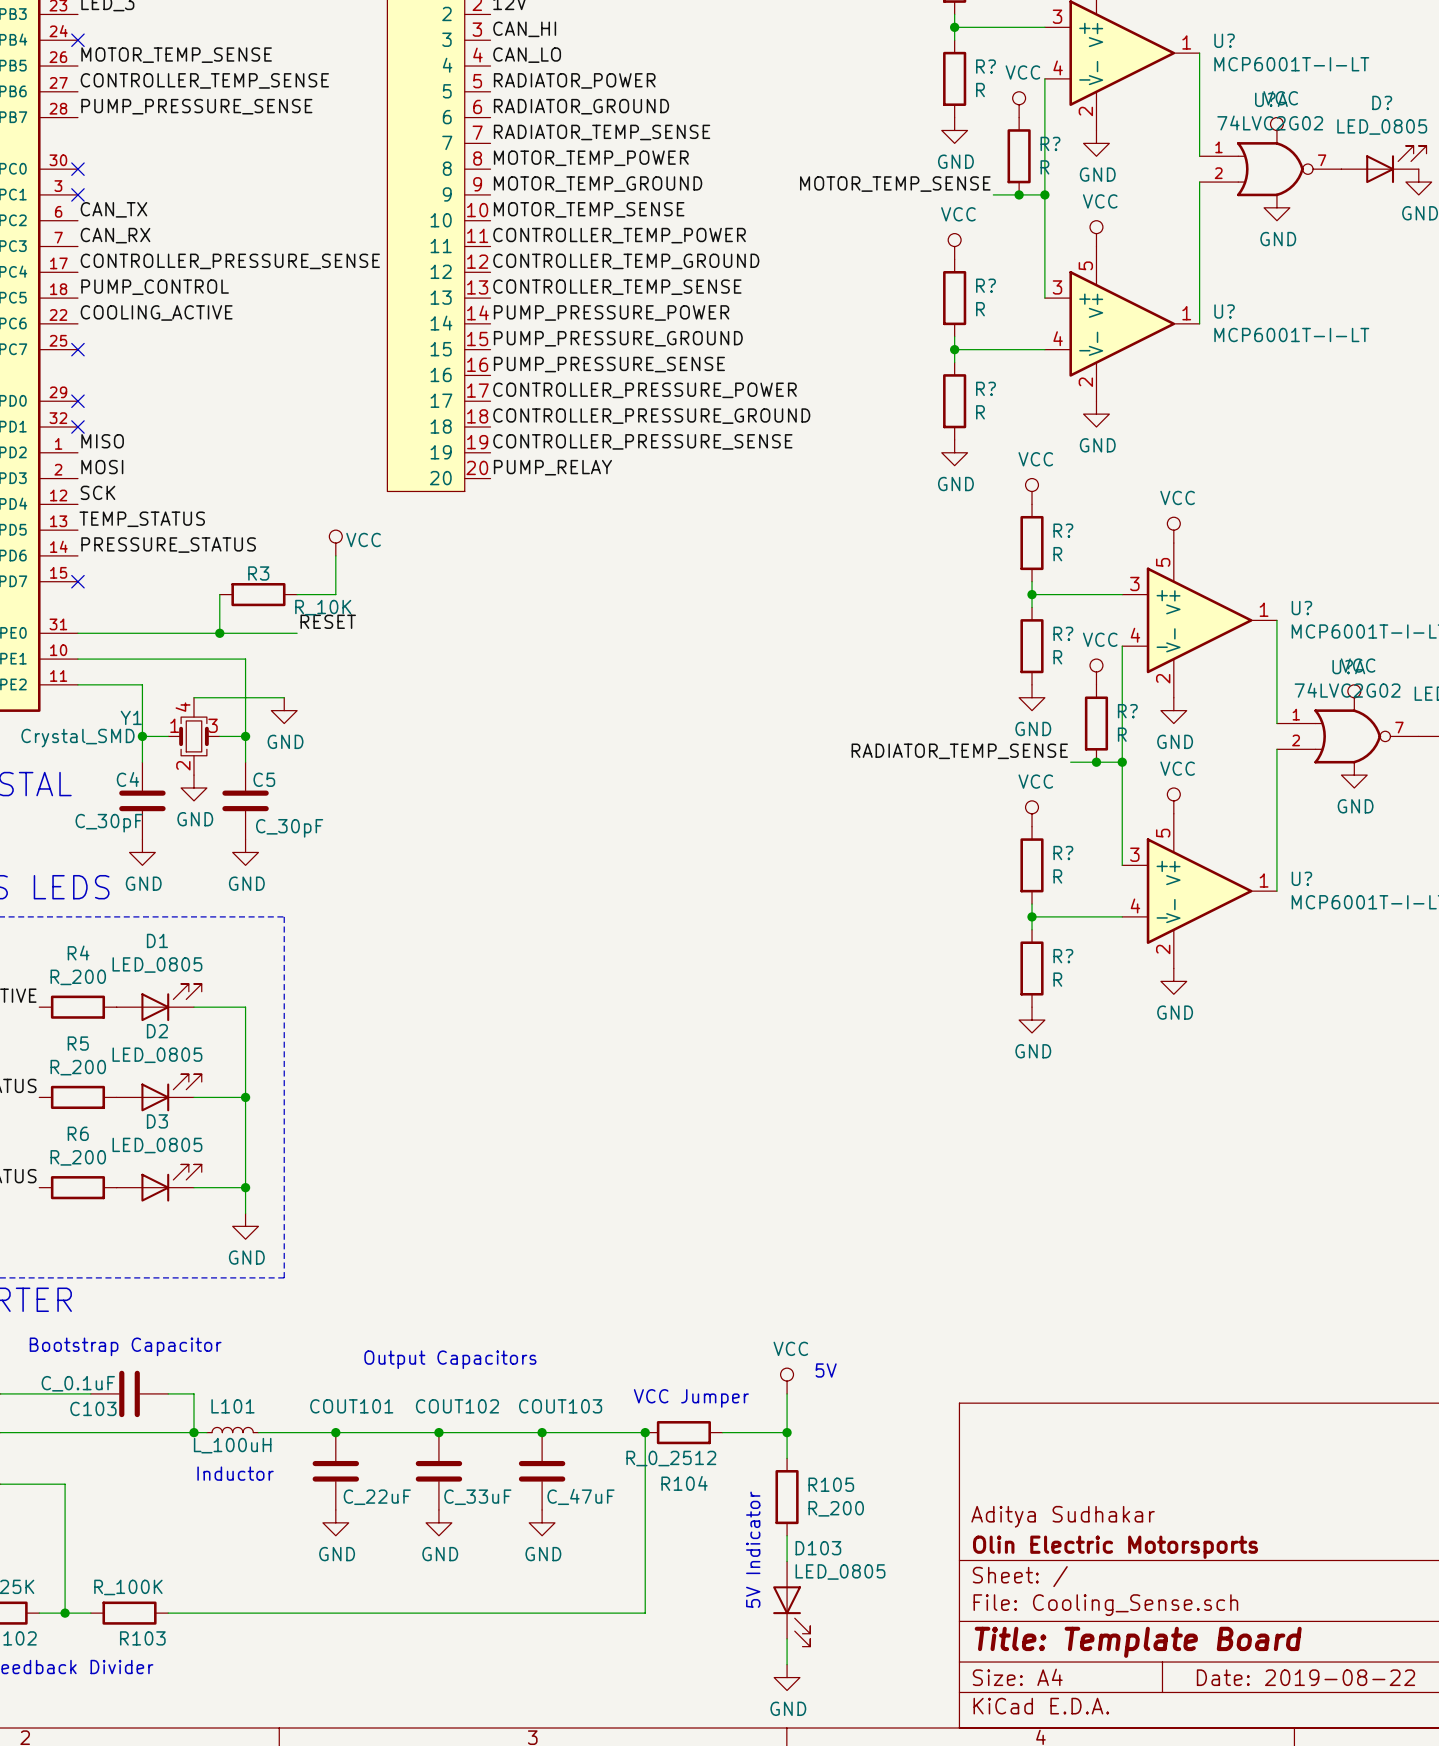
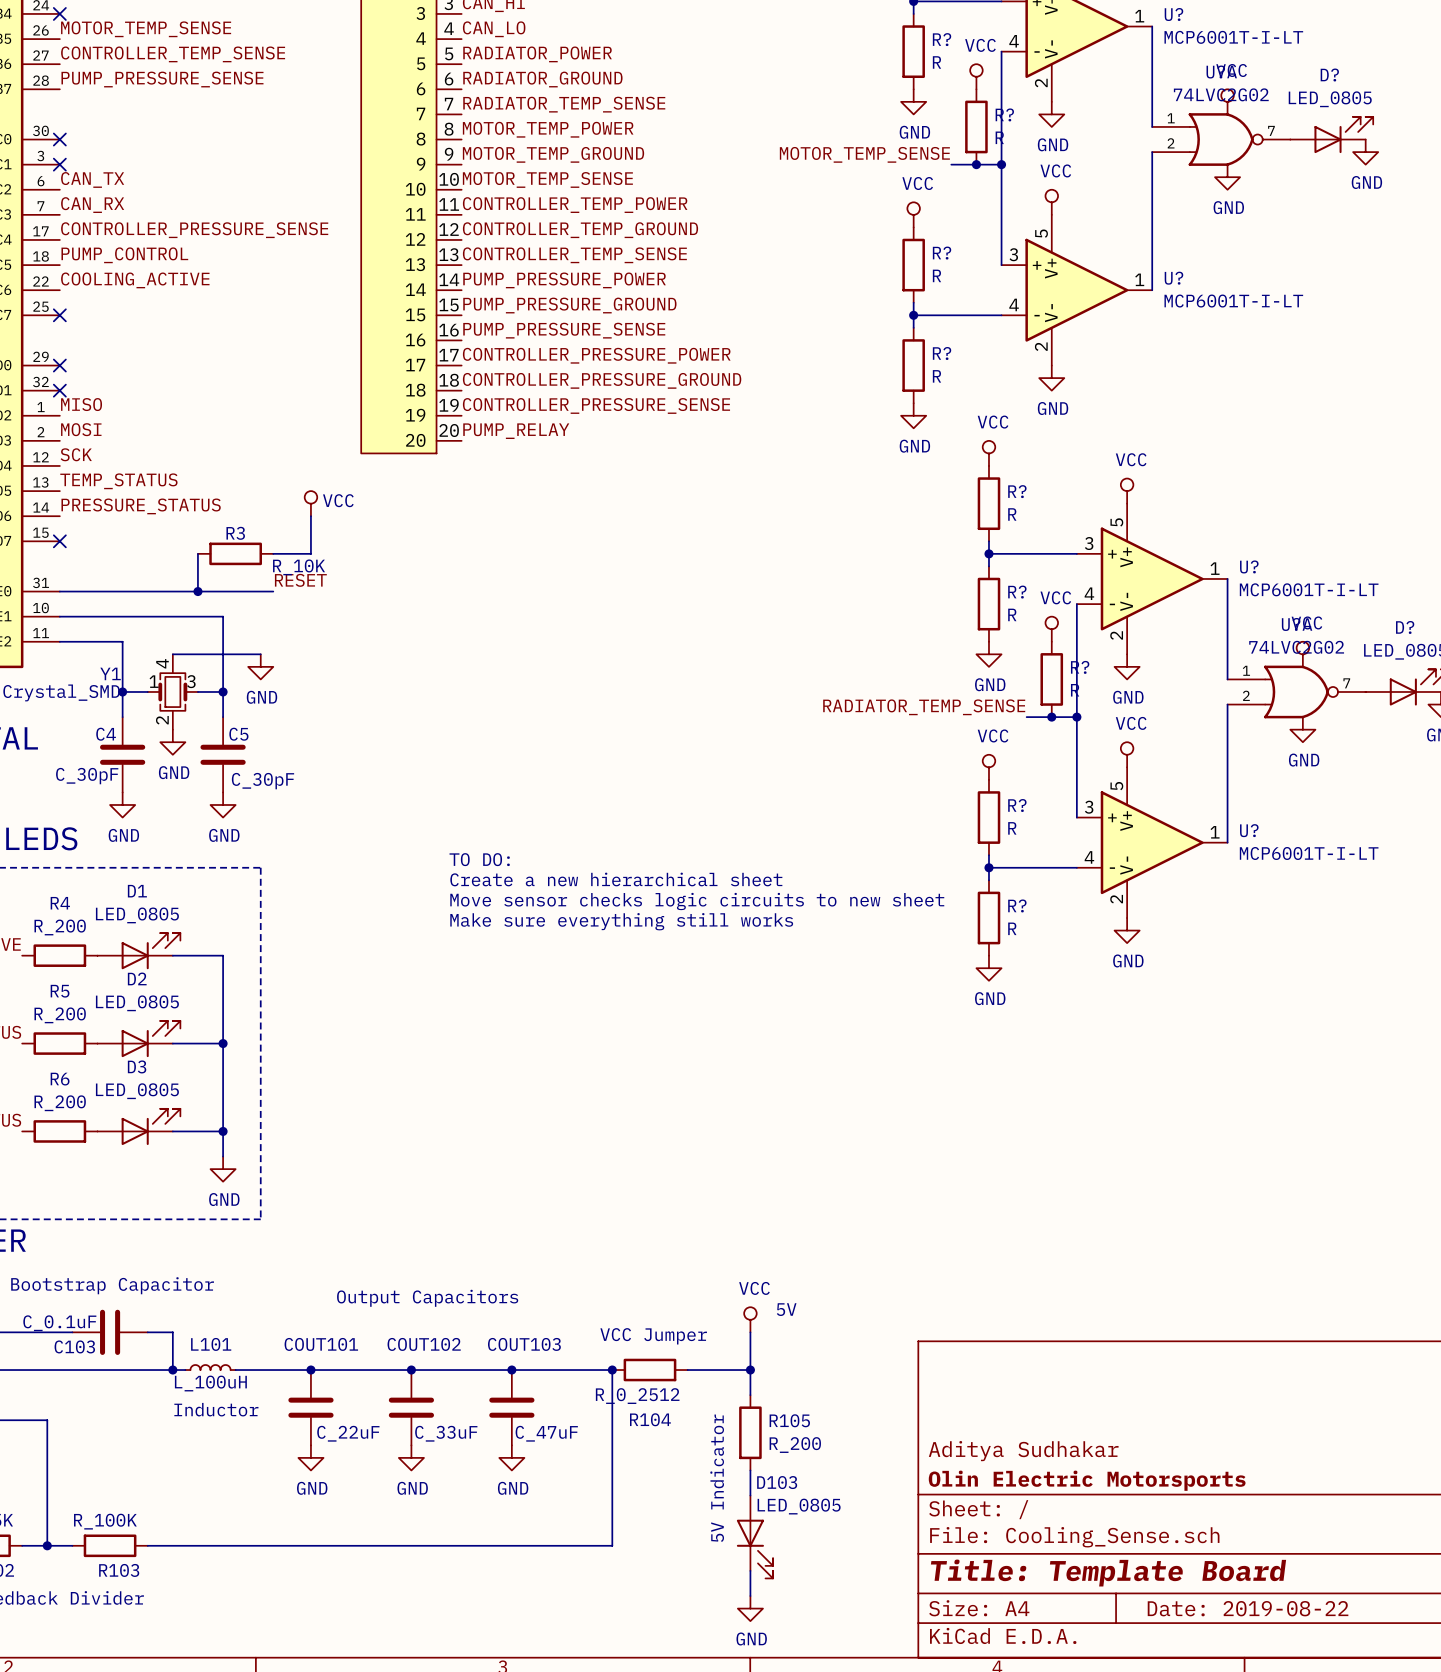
text: none -> TO DO: (479, 859)
text: none -> Create a new hierarchical sheet (616, 879)
text: none -> Move sensor checks logic circuits to new sheet (697, 901)
text: none -> Make sure everything still works (621, 921)

